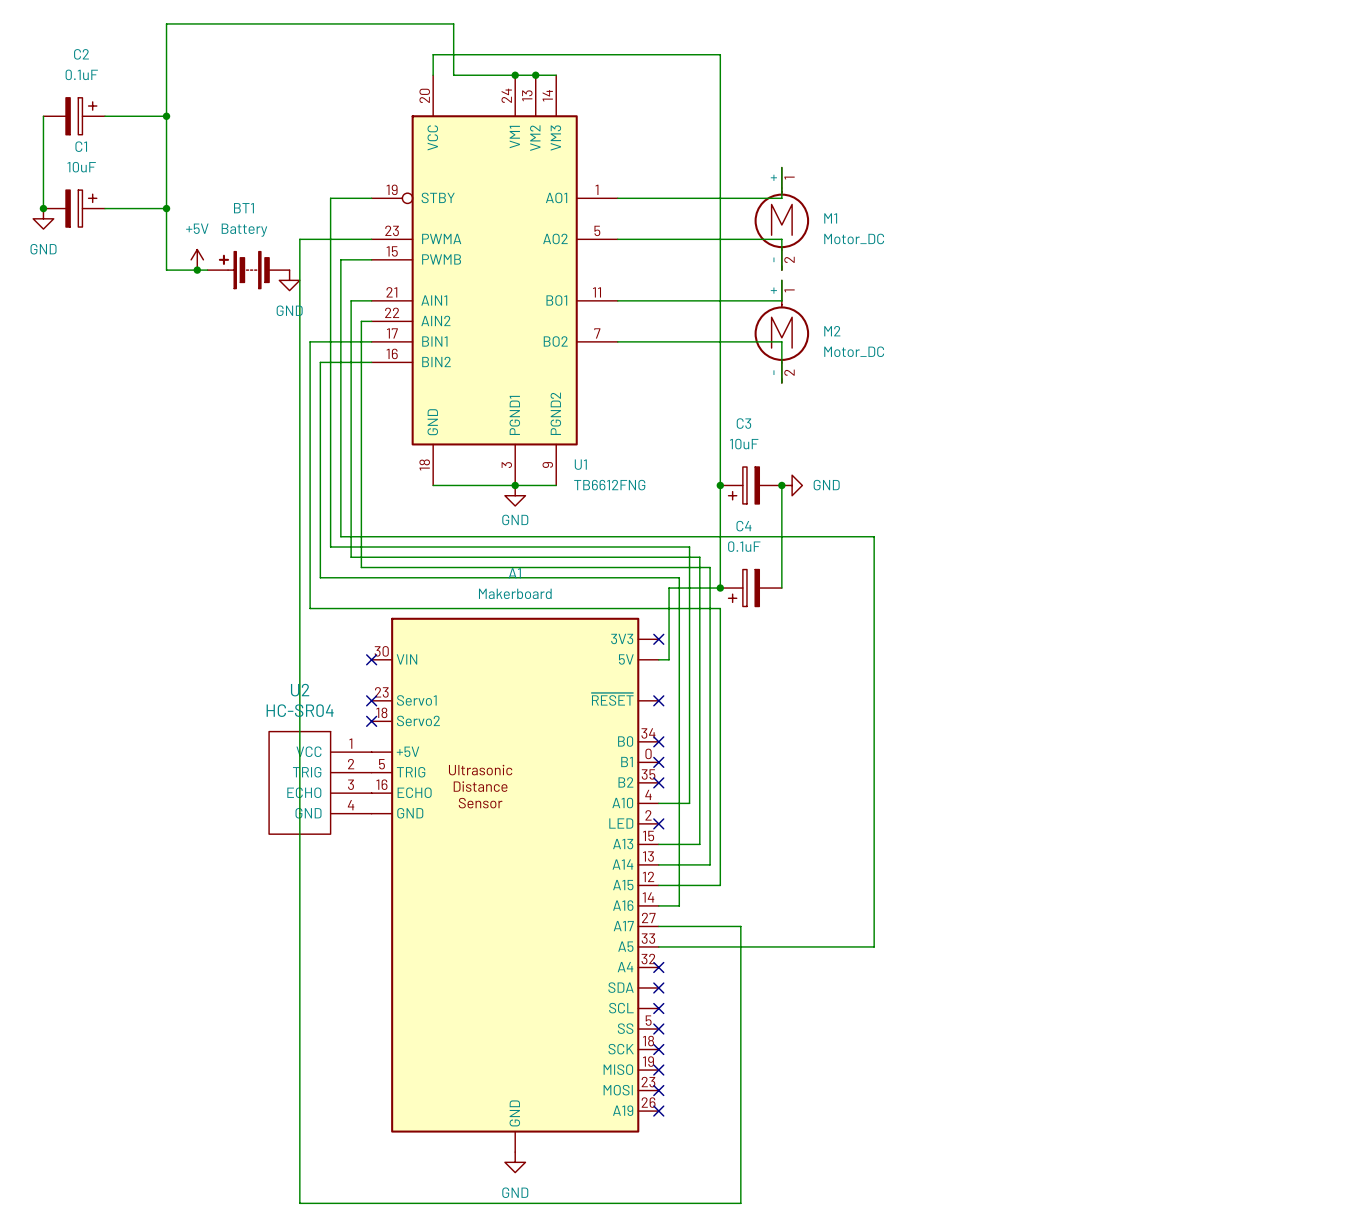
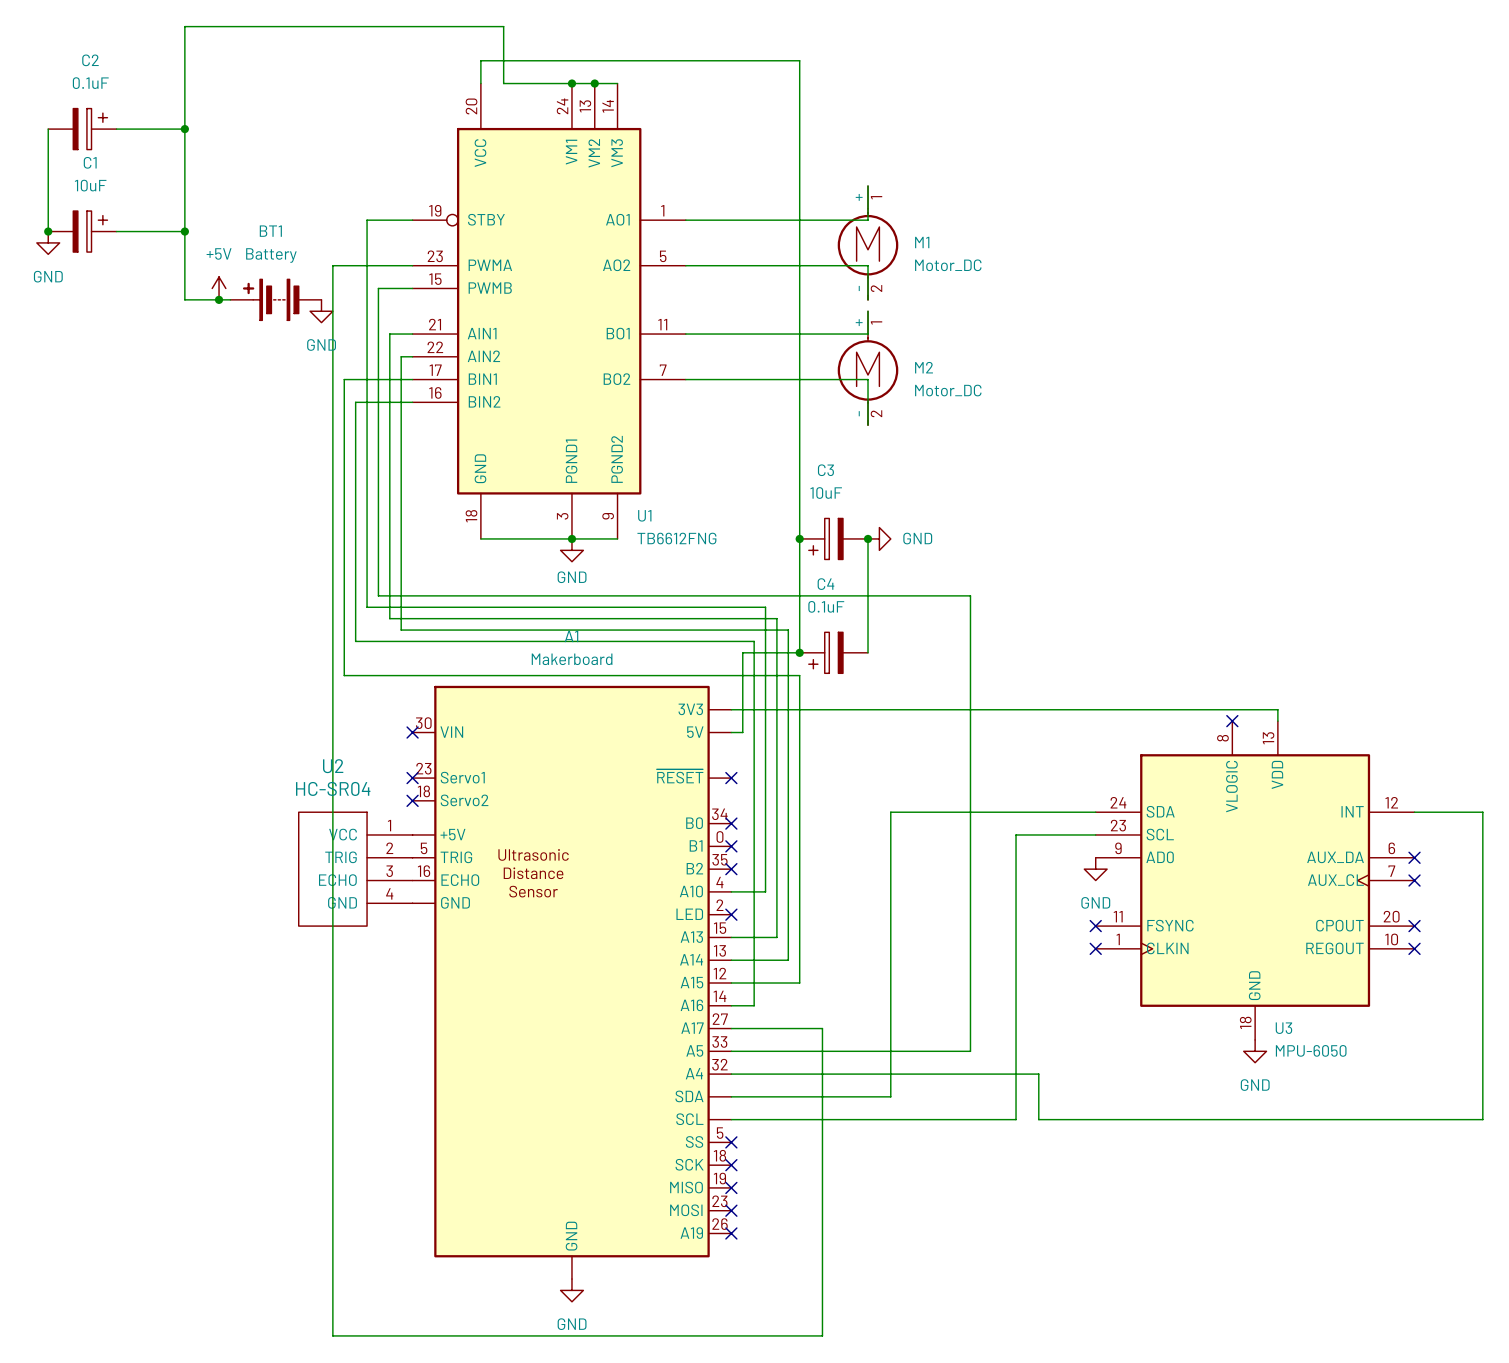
wire: none -> (731, 709) (1277, 709) (1277, 721)
no-connect mark: (658, 639) -> none
no-connect mark: none -> (1232, 721)
wire: none -> (1095, 812) (890, 812) (890, 1096) (731, 1096)
wire: none -> (1414, 812) (1482, 812) (1482, 1119) (1038, 1119) (1038, 1074) (731, 1074)
wire: none -> (1095, 834) (1016, 834) (1016, 1119) (731, 1119)
no-connect mark: none -> (1414, 857)
power symbol: none -> GND (1095, 869)
U3: none -> MPU-6050 (1255, 880)
no-connect mark: none -> (1414, 880)
no-connect mark: none -> (1095, 926)
no-connect mark: none -> (1414, 926)
no-connect mark: none -> (1095, 948)
no-connect mark: none -> (1414, 948)
power symbol: none -> GND (1255, 1051)
no-connect mark: (658, 967) -> none
no-connect mark: (658, 987) -> none
no-connect mark: (658, 1008) -> none

